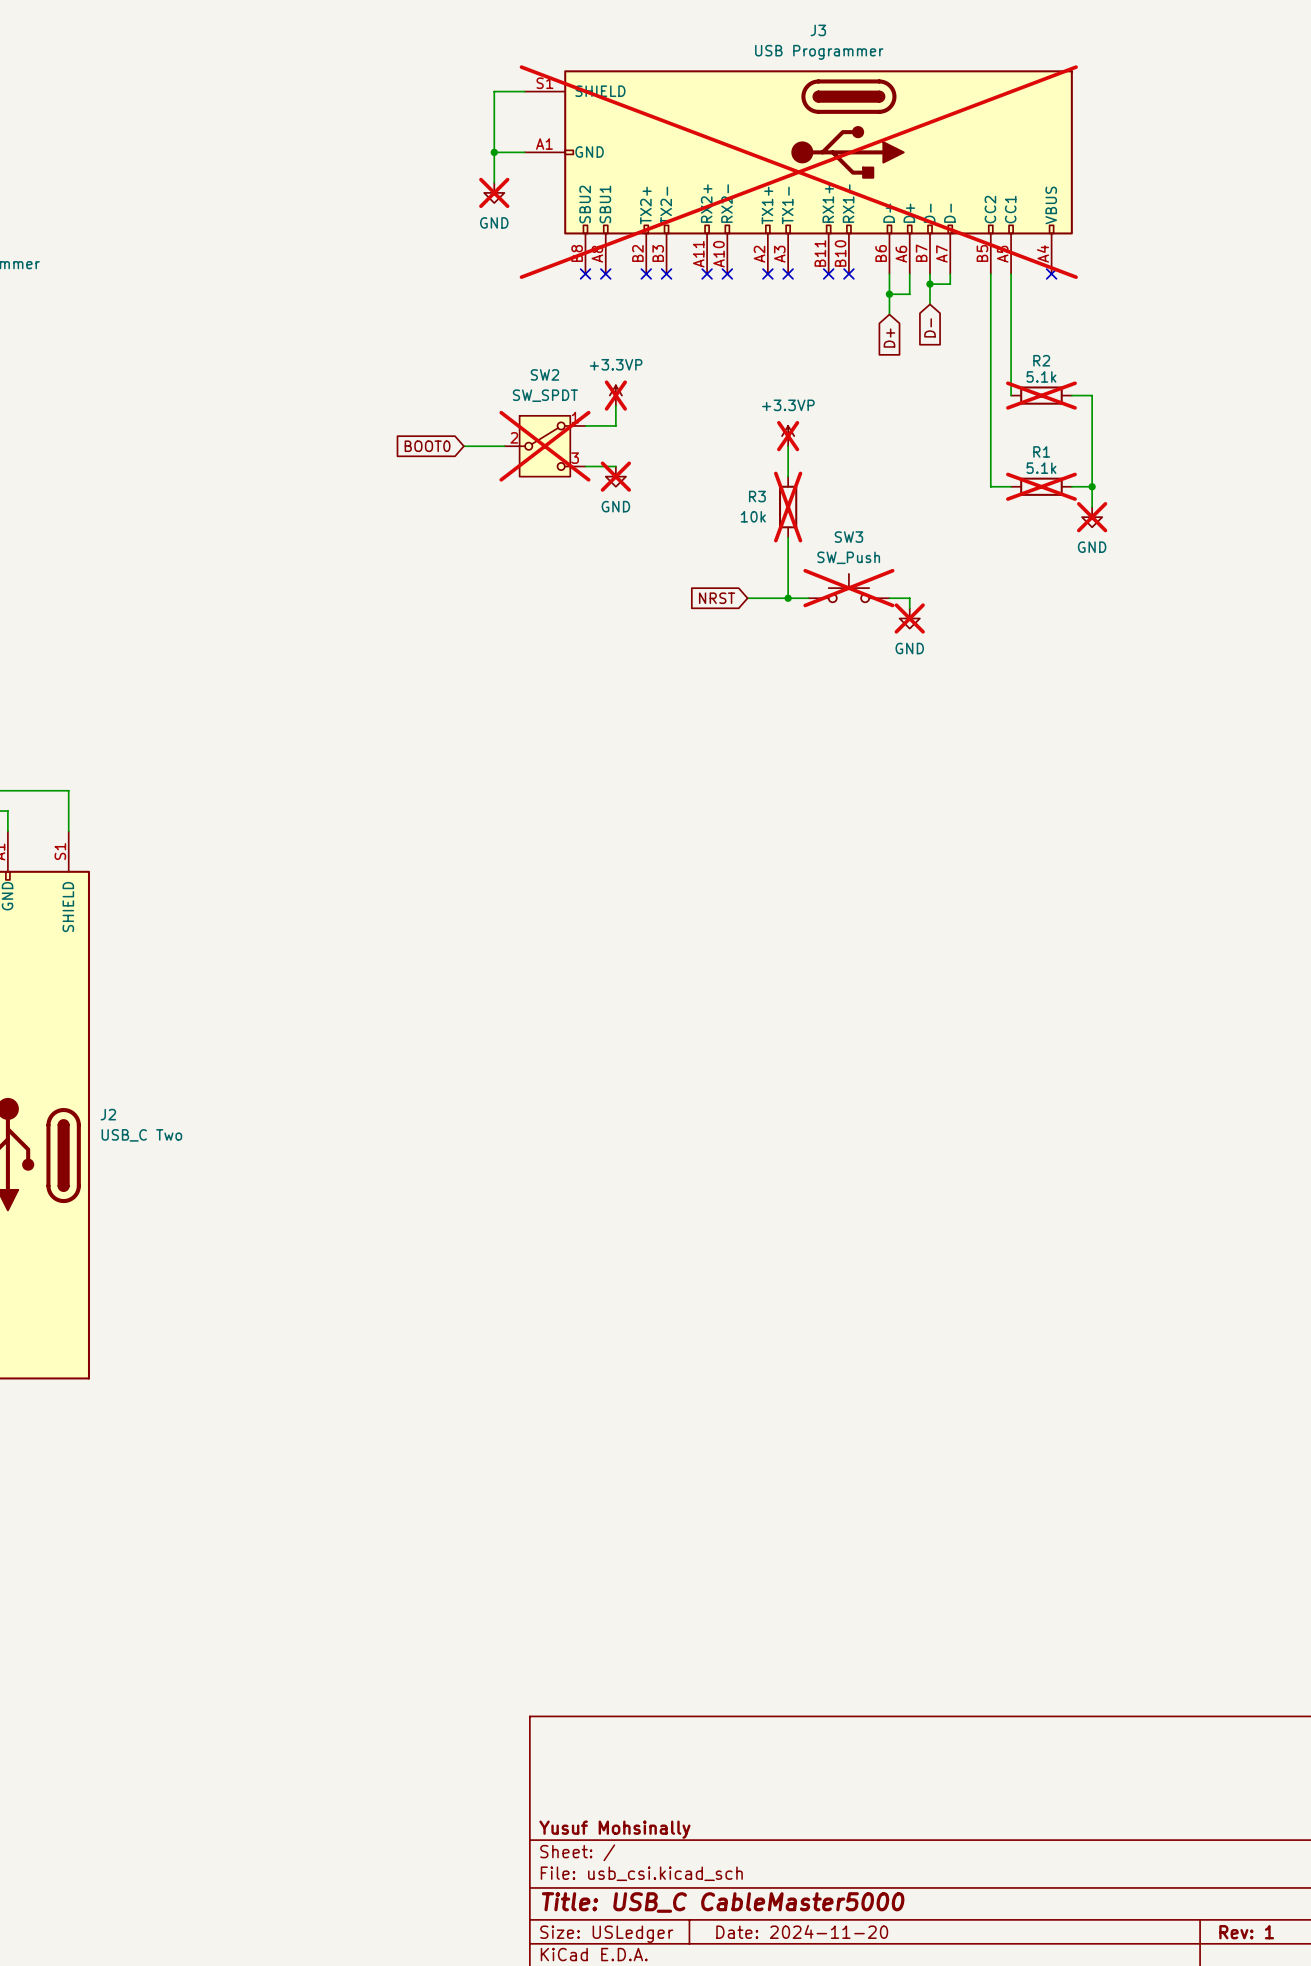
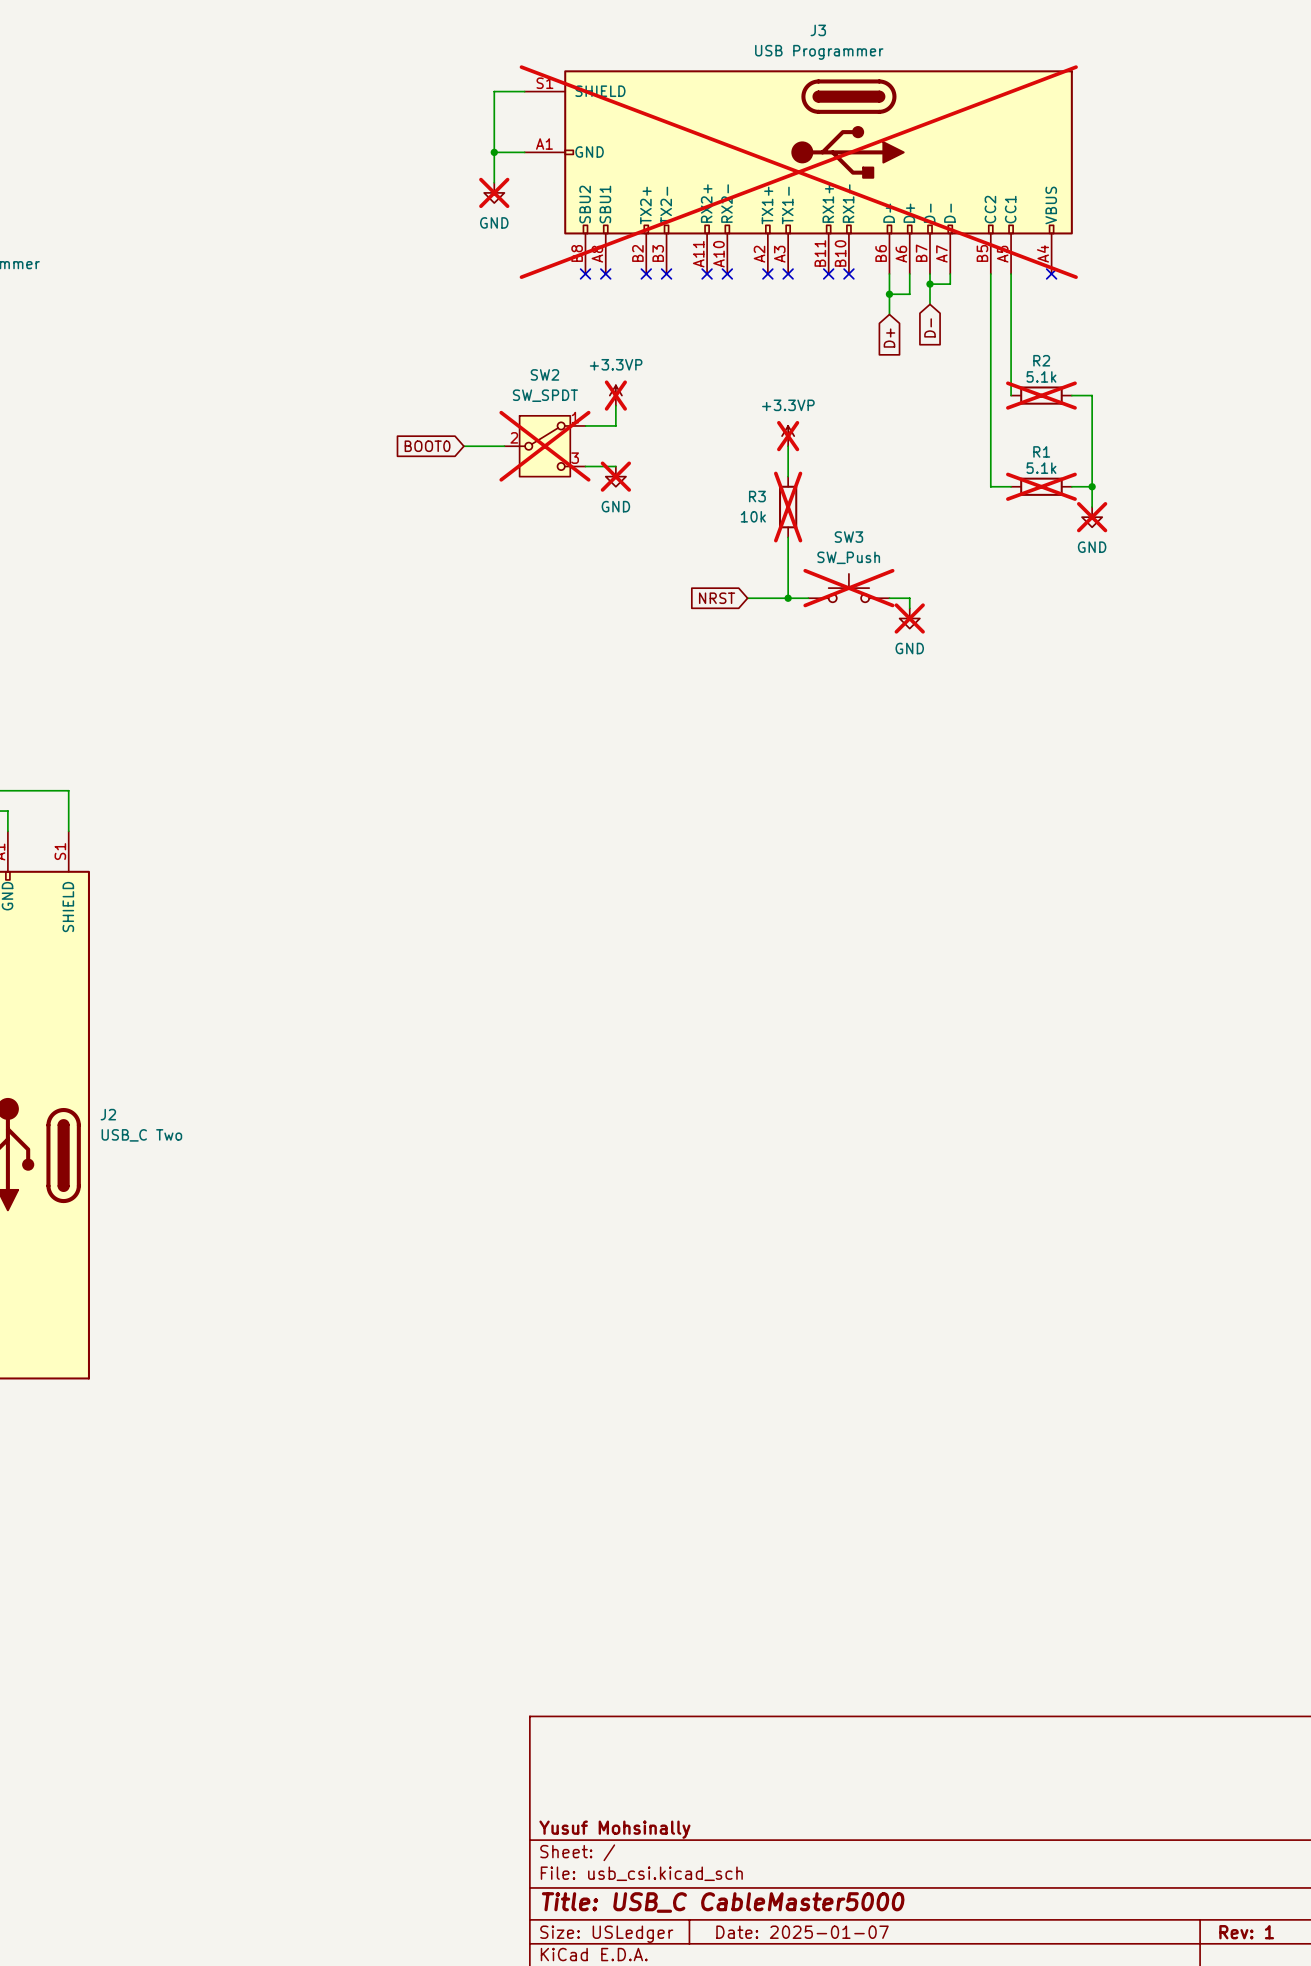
title block: Date: 2024-11-20 (802, 1931) -> Date: 2025-01-07 (802, 1932)

